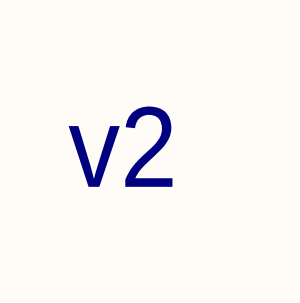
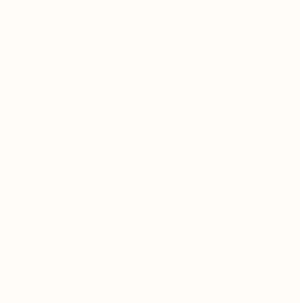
text: v2 (120, 146) -> none

